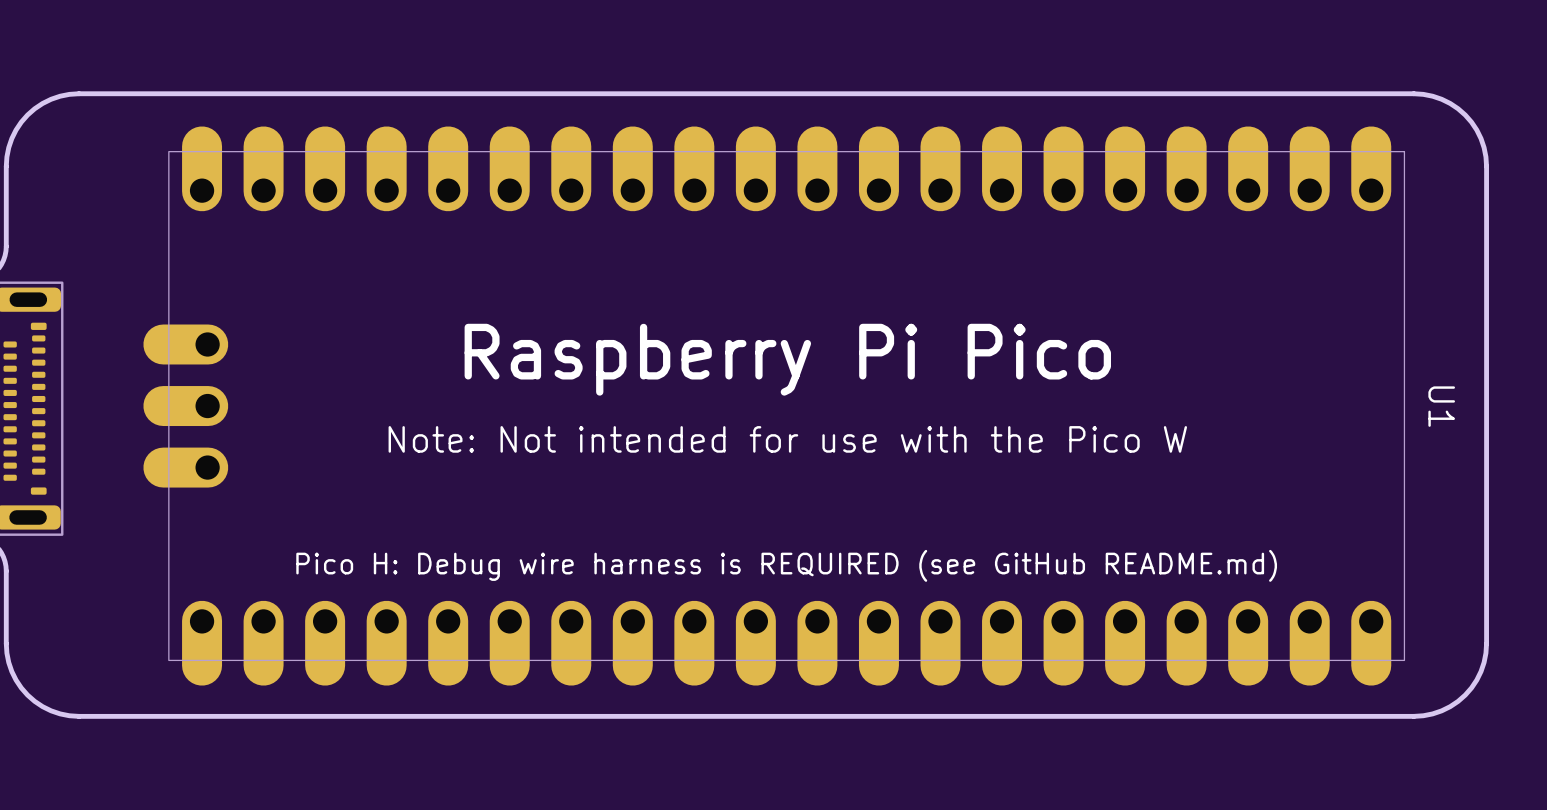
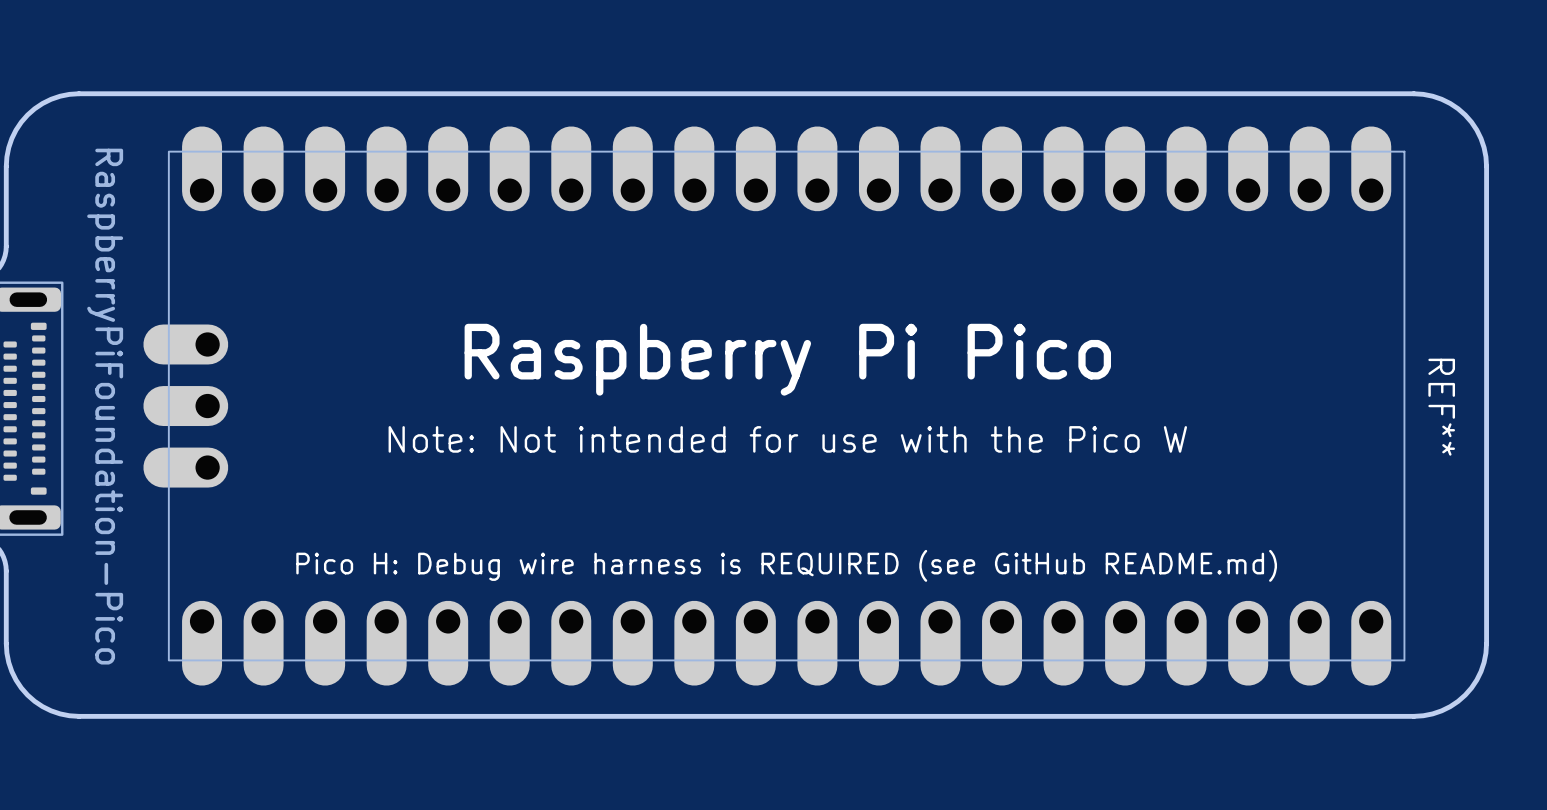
U1 value: none -> RaspberryPiFoundation-Pico (105, 406)
U1 name: U1 (1441, 406) -> REF** (1441, 407)

